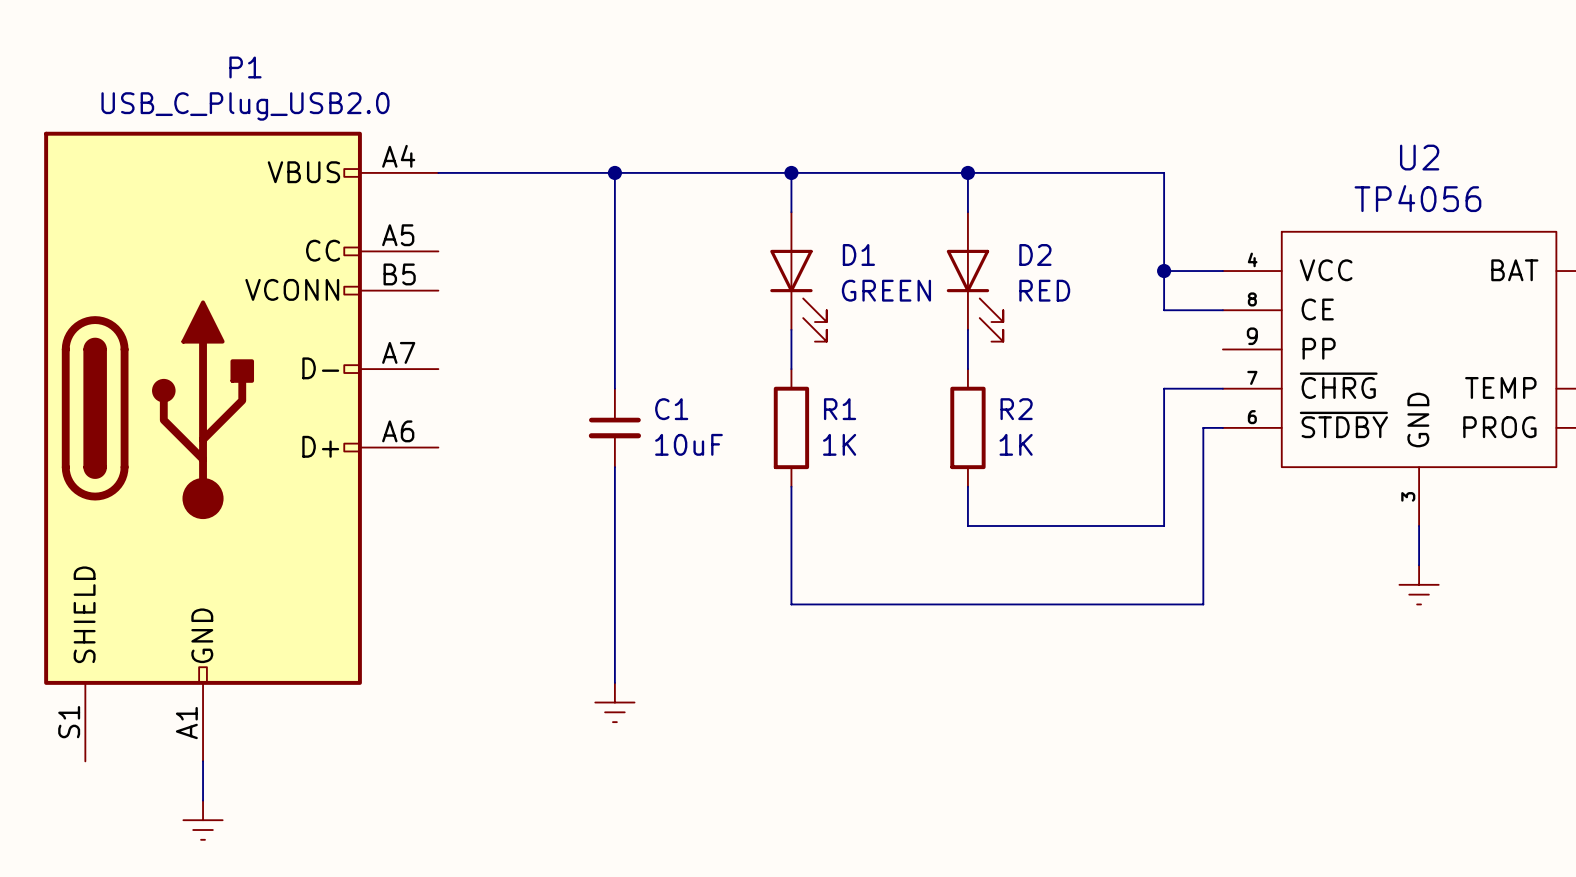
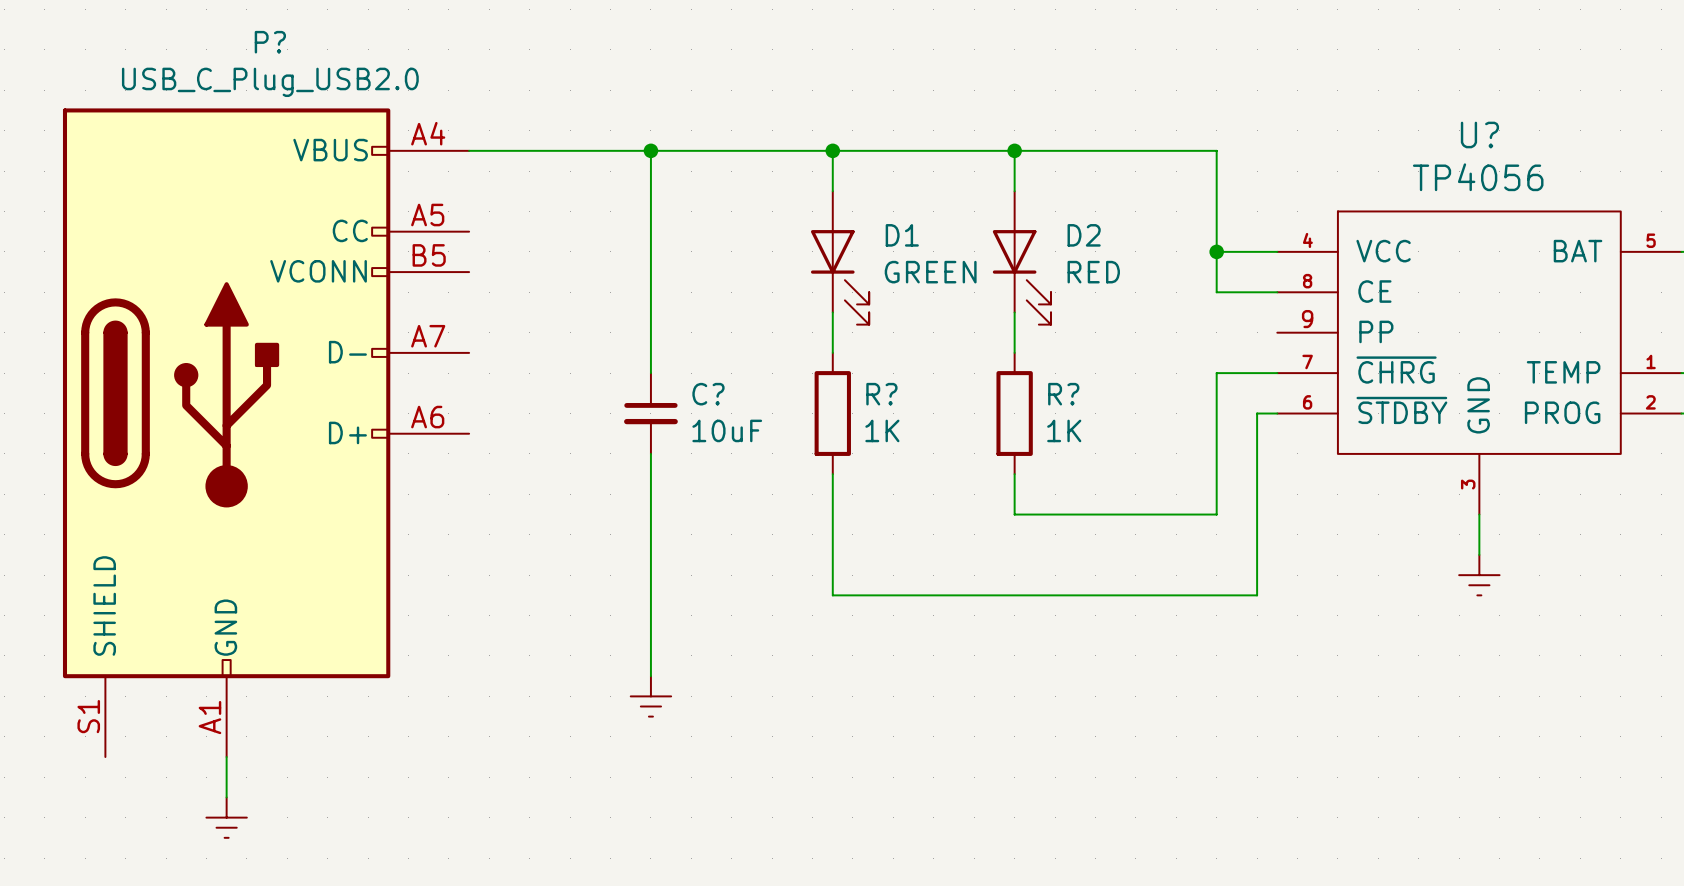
P1 name: P1 (245, 67) -> P? (270, 42)
U2 name: U2 (1419, 157) -> U? (1479, 134)
C1 name: C1 (671, 409) -> C? (708, 394)
R1 name: R1 (840, 409) -> R? (881, 394)
R2 name: R2 (1016, 409) -> R? (1063, 394)

